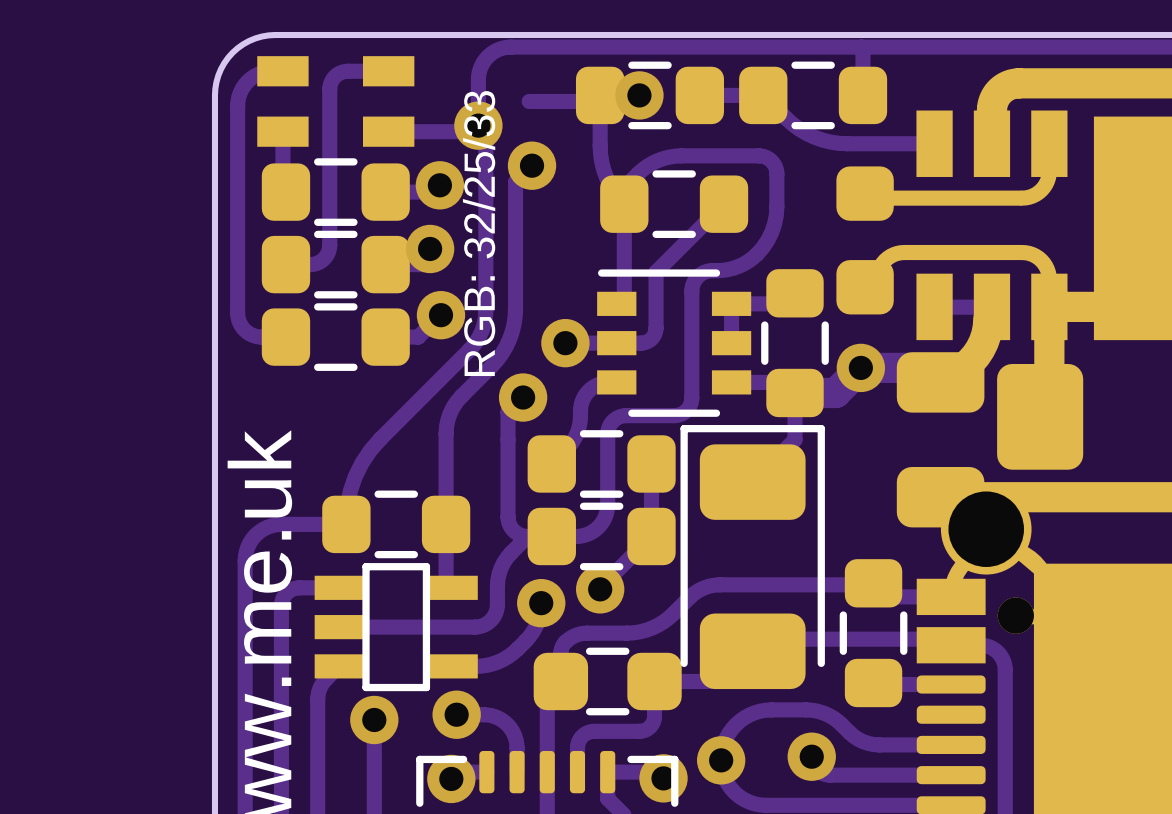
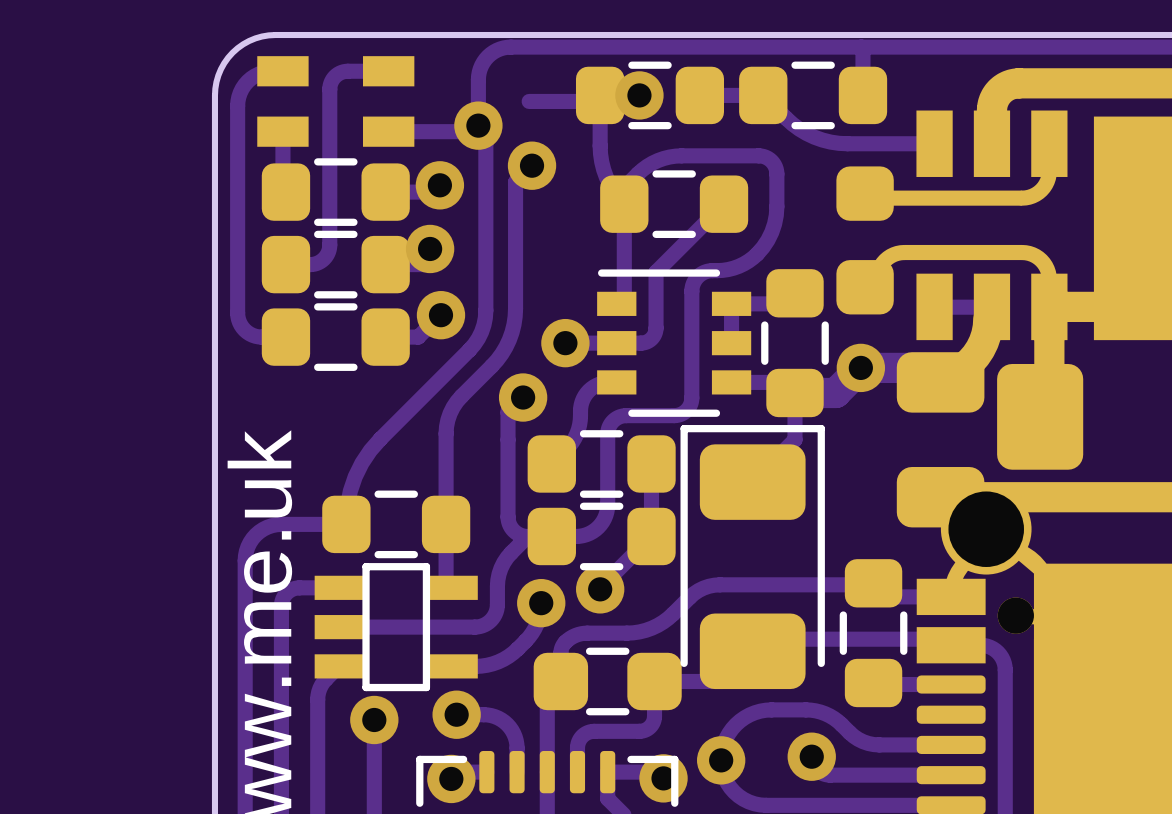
text: RGB: 32/25/33 (479, 233) -> none

